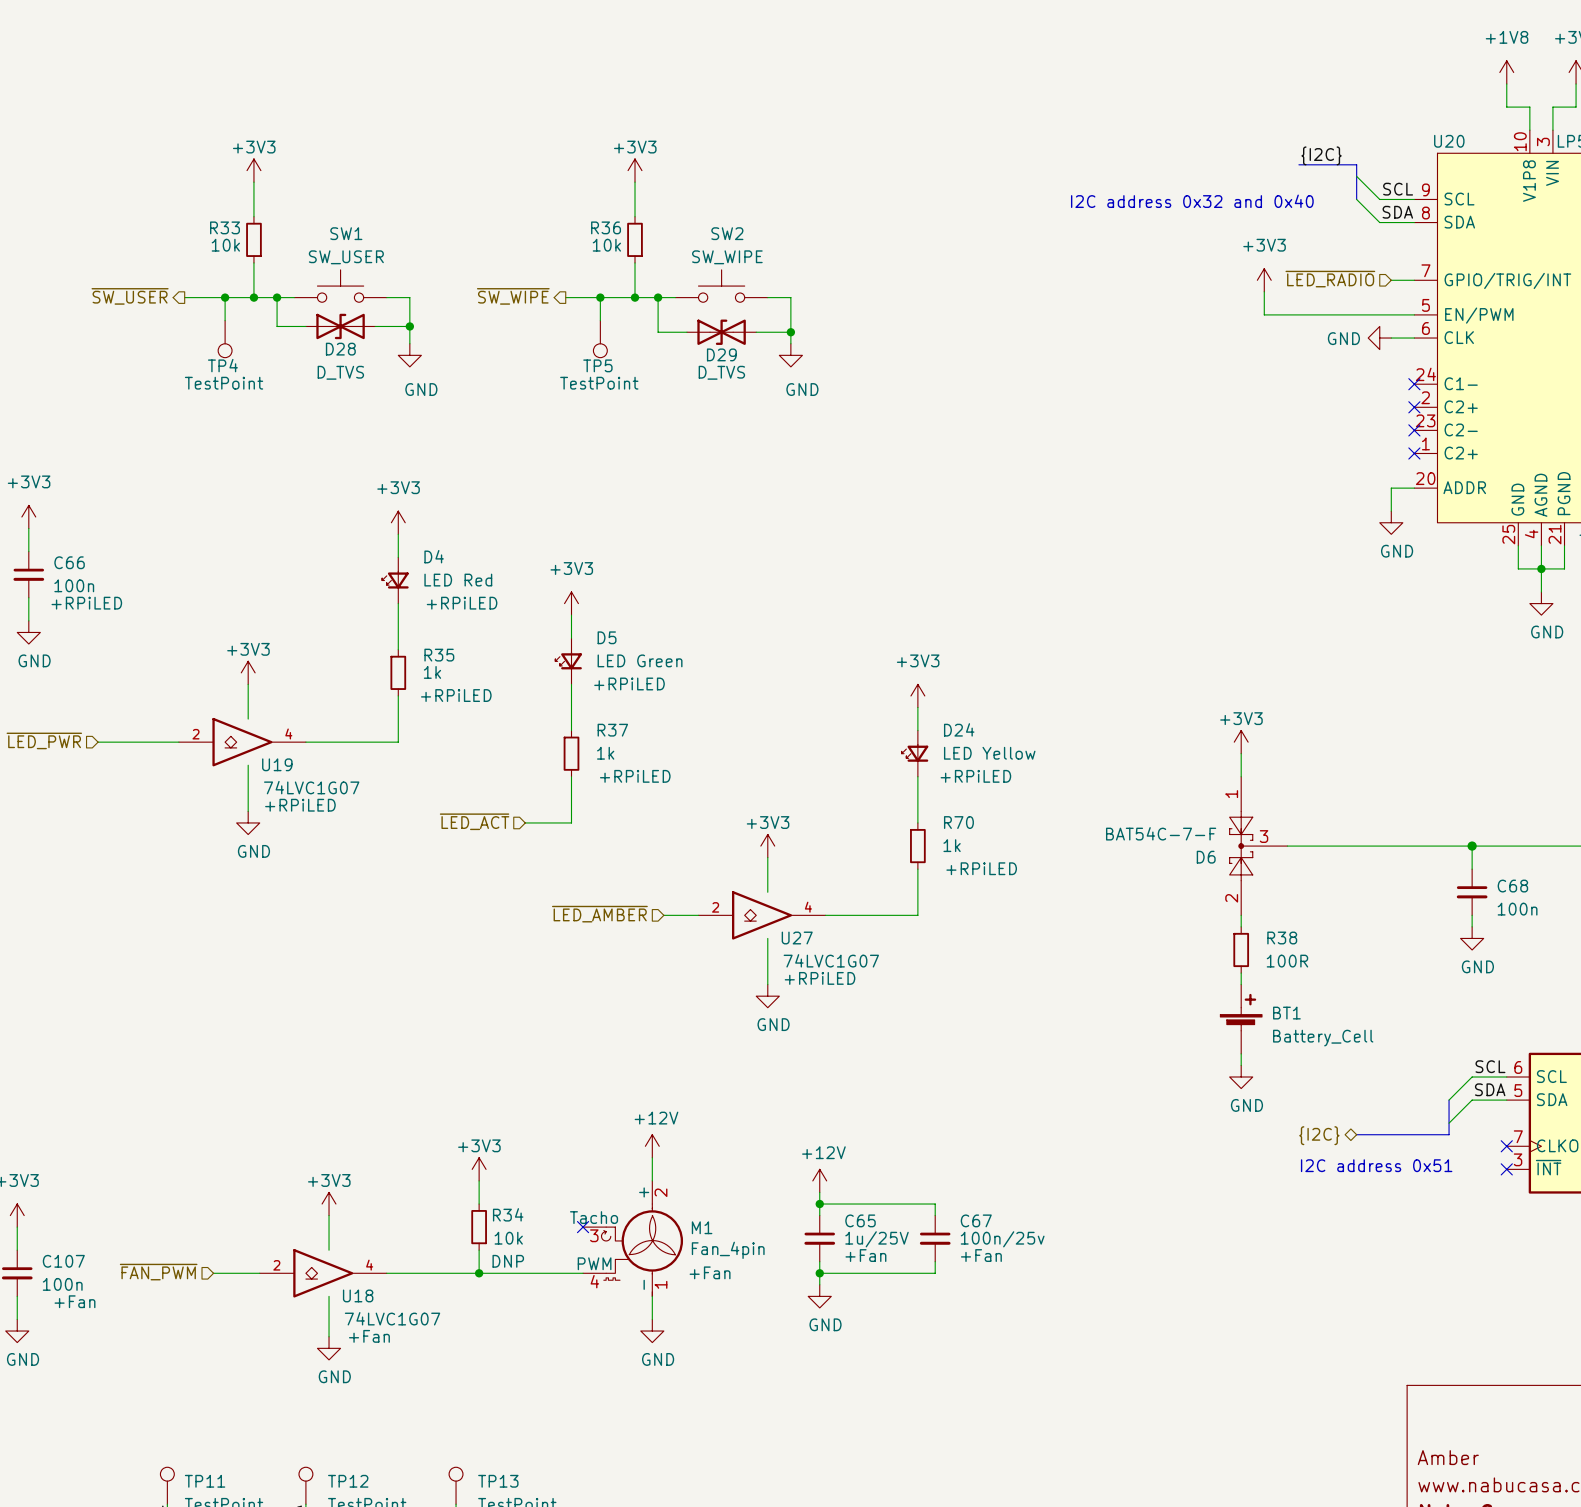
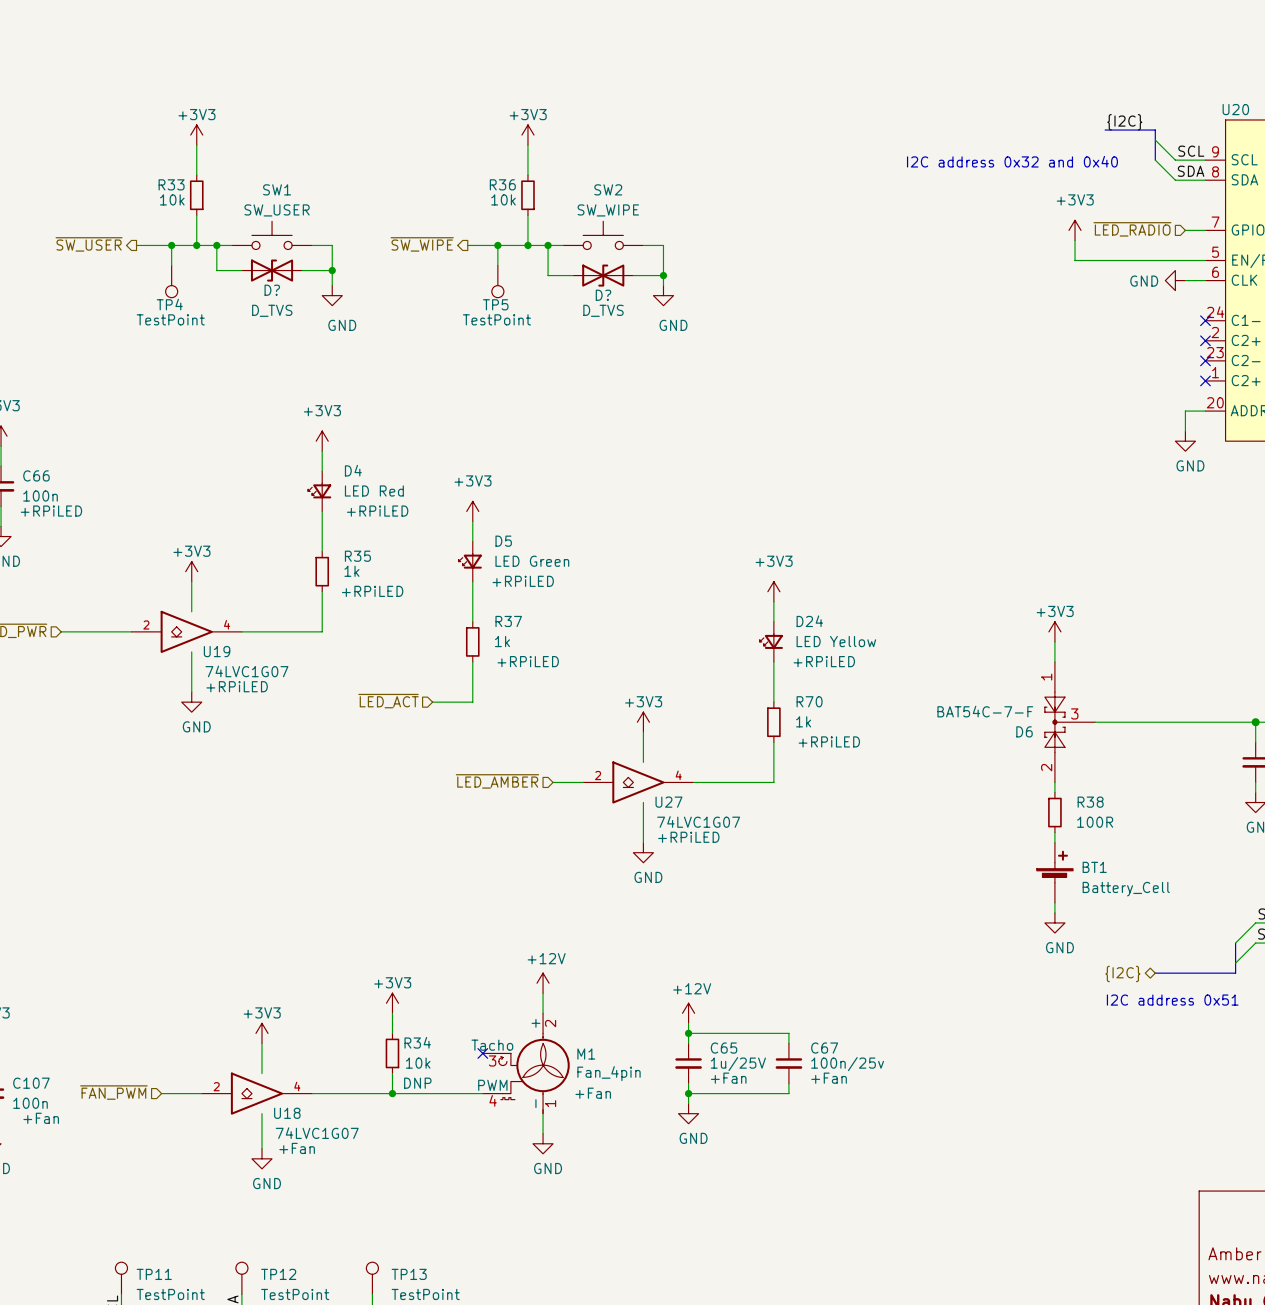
D28 name: D28 (340, 349) -> D? (272, 290)
D29 name: D29 (721, 354) -> D? (603, 295)

